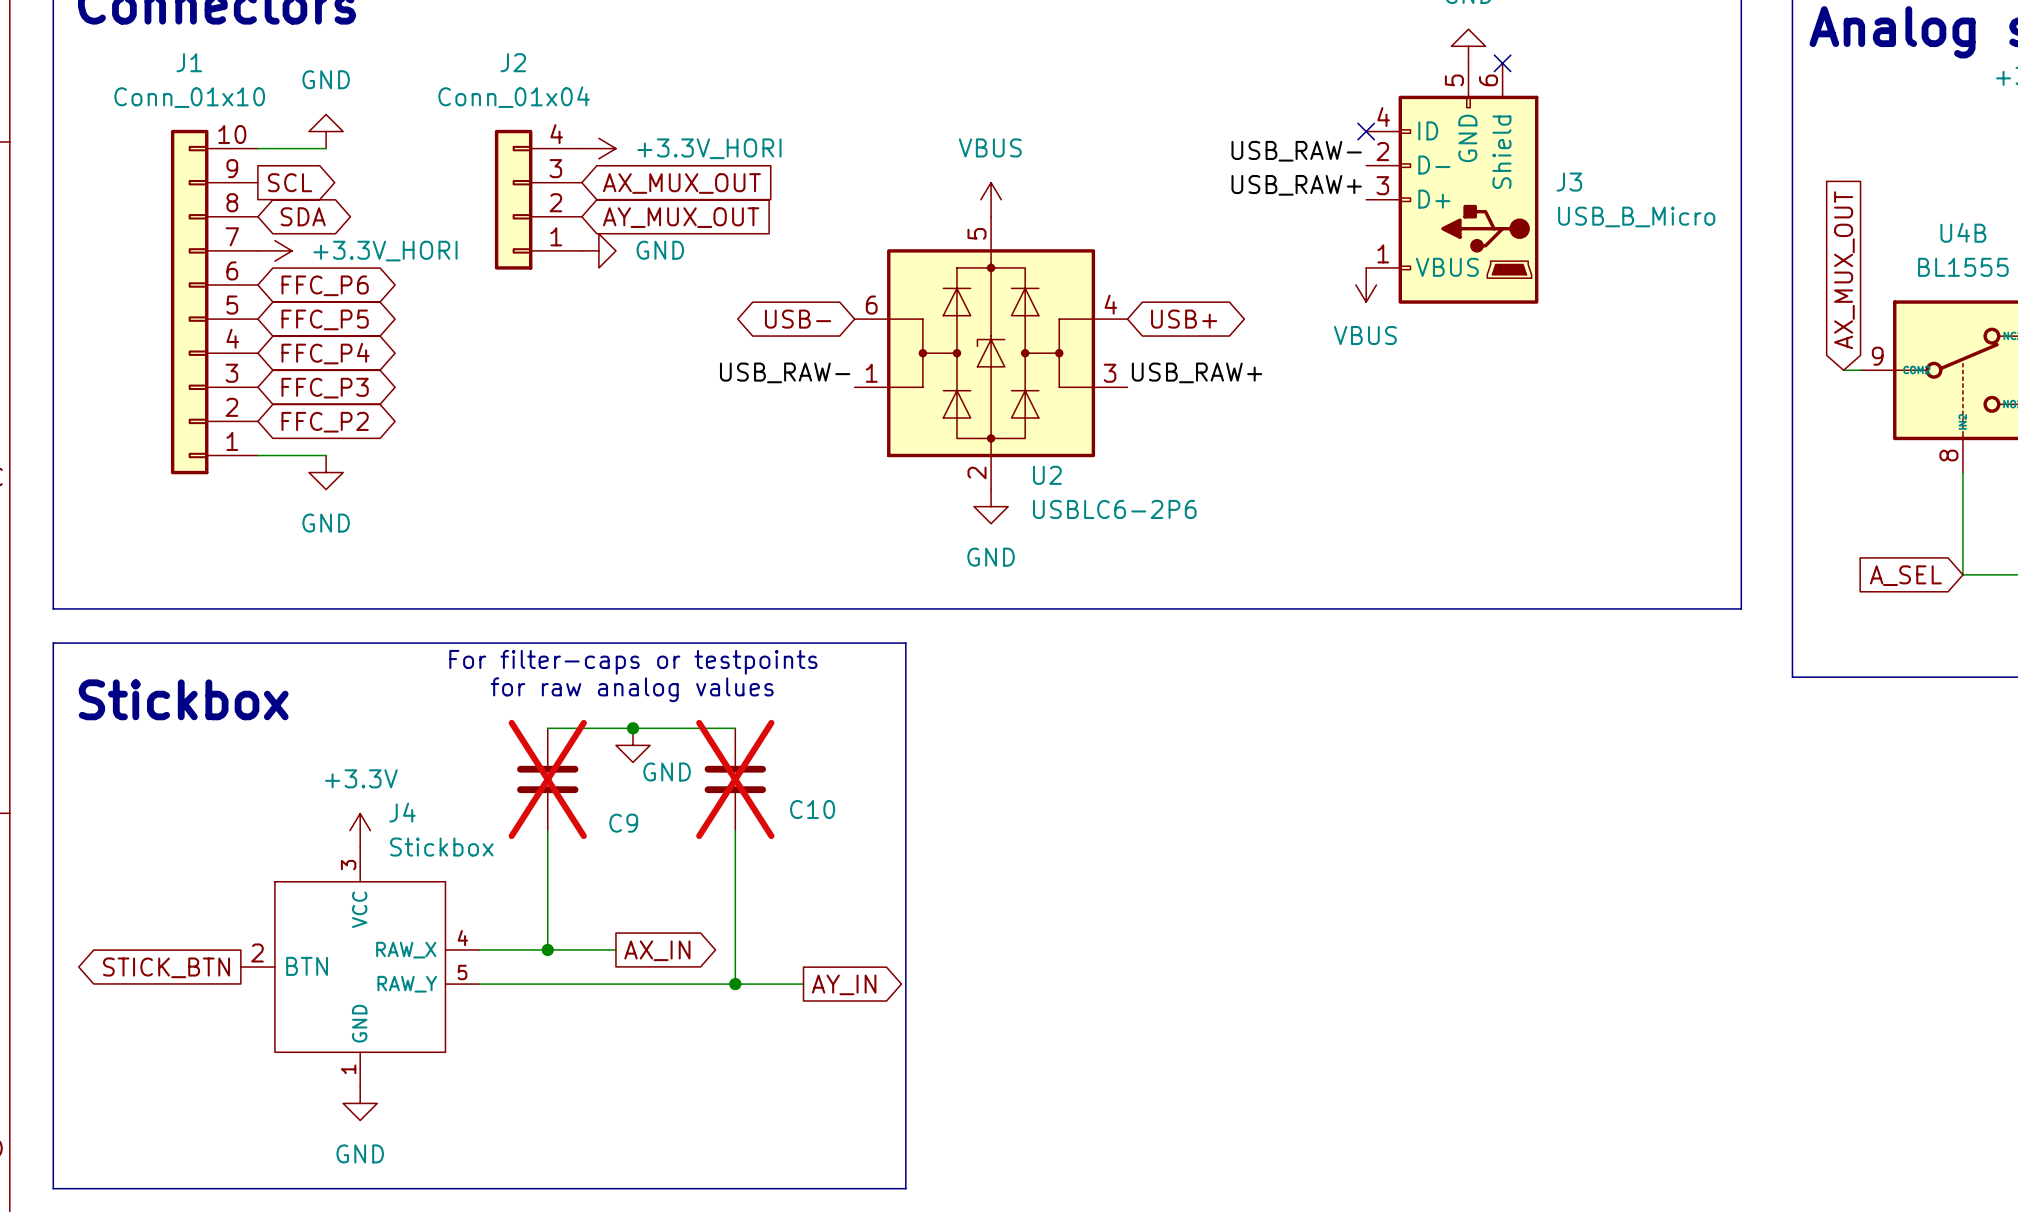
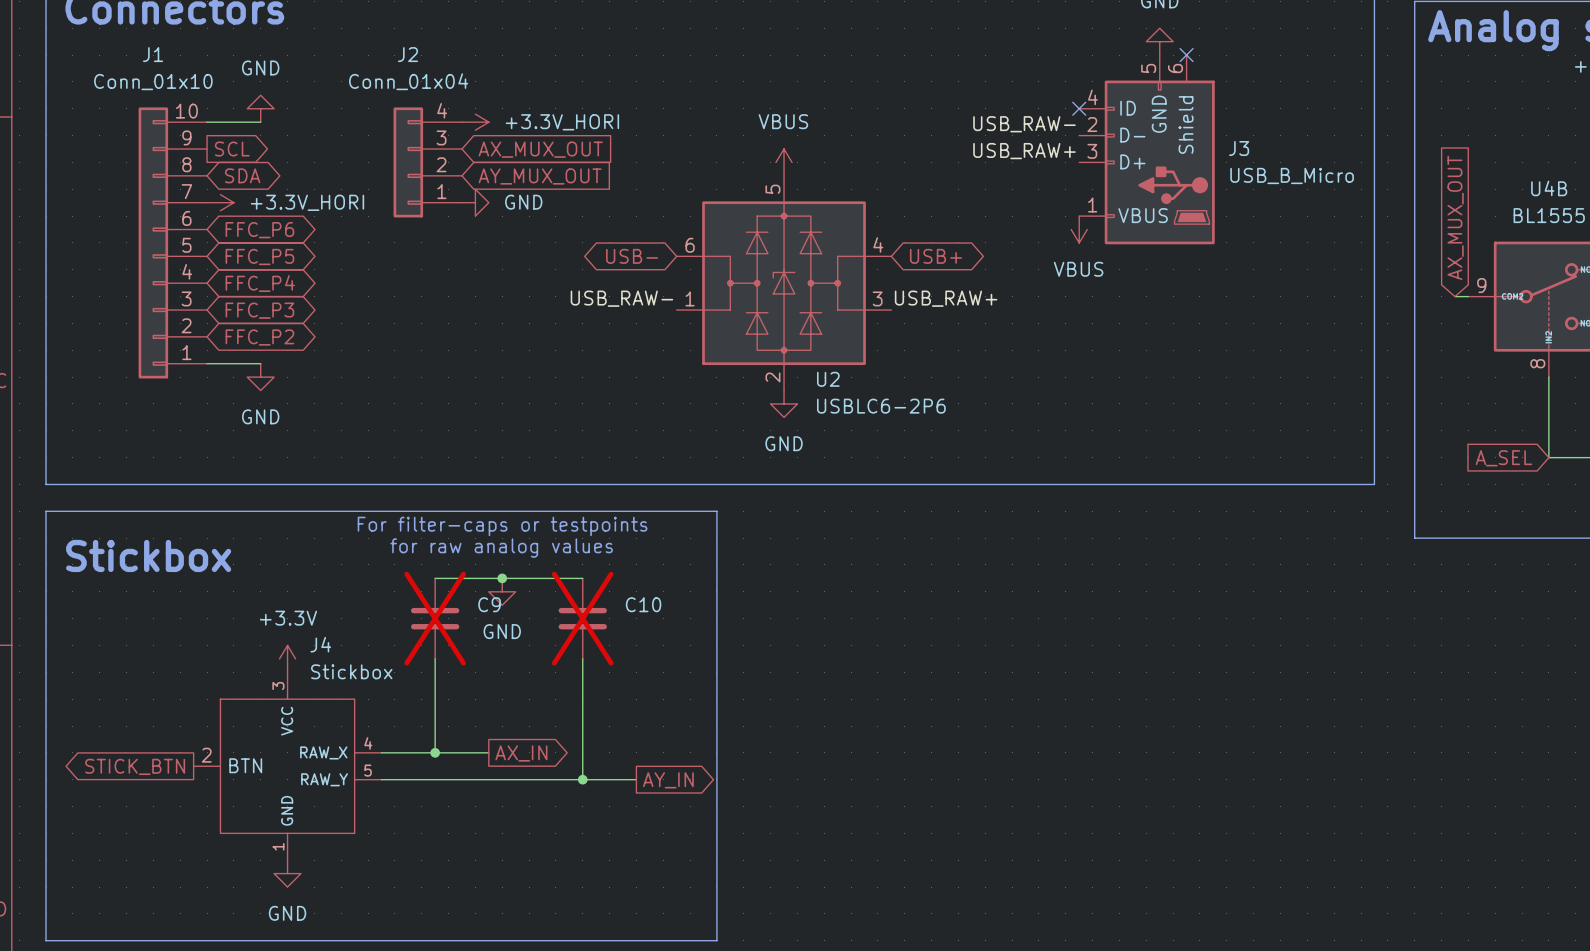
power symbol text position: GND (667, 772) -> GND (502, 631)
C10 name position: C10 (812, 809) -> C10 (643, 604)
C9 name position: C9 (623, 823) -> C9 (489, 604)

